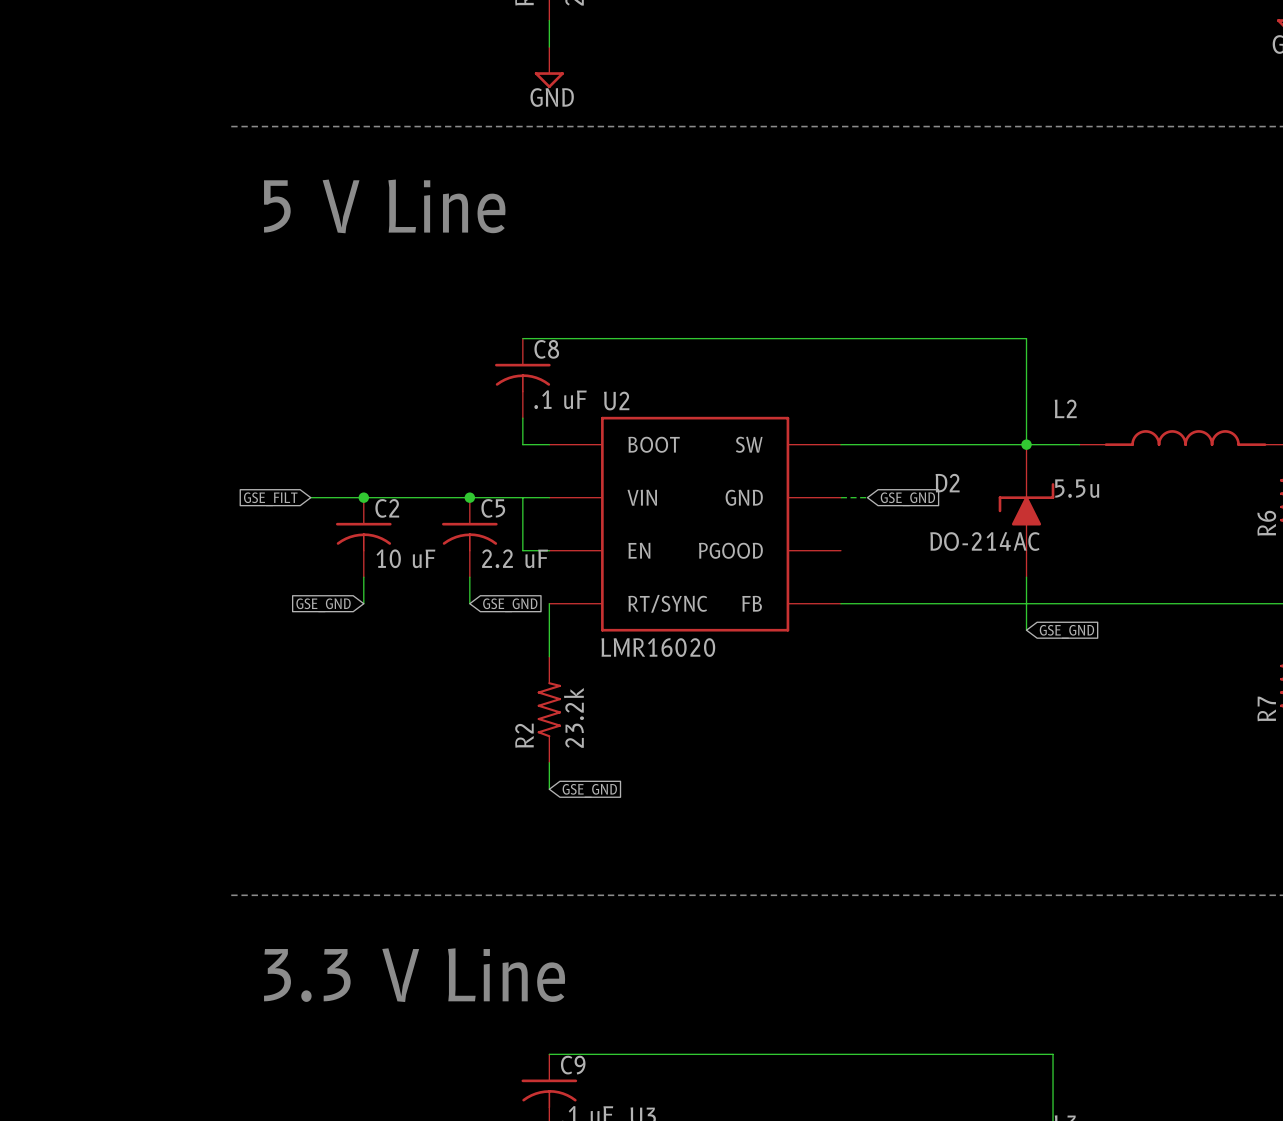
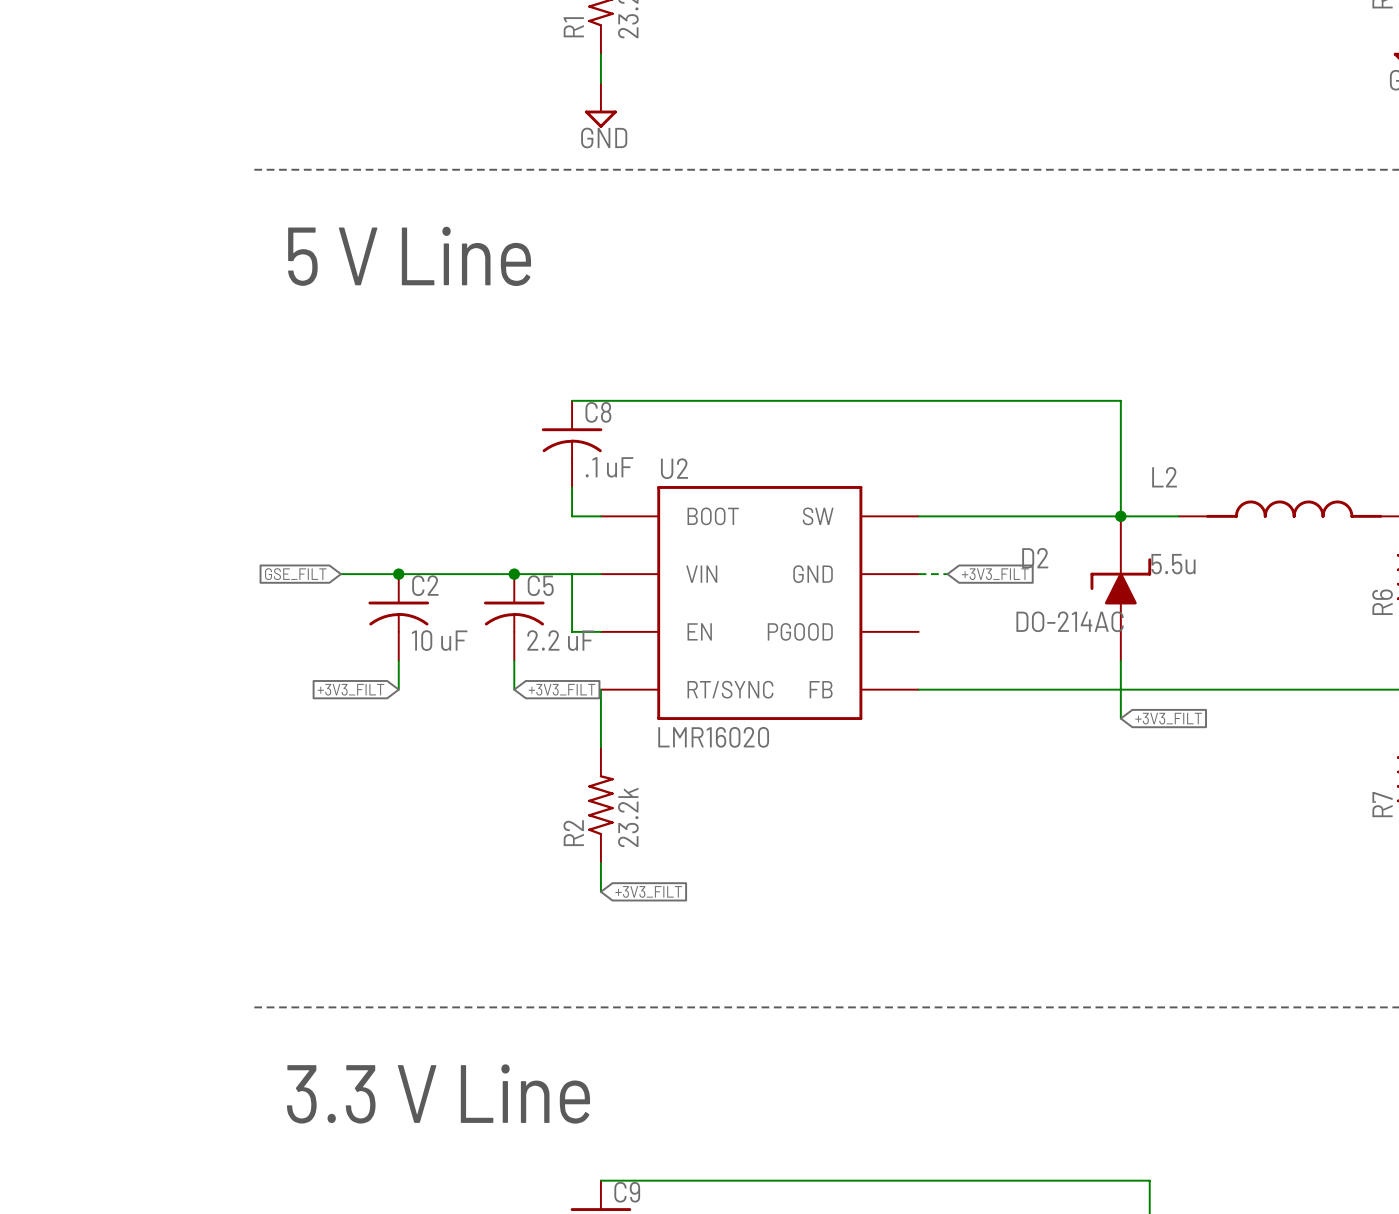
global label: GSE_GND (907, 499) -> +3V3_FILT (995, 574)
global label: GSE_GND (323, 605) -> +3V3_FILT (350, 689)
global label: GSE_GND (510, 605) -> +3V3_FILT (562, 689)
global label: GSE_GND (1066, 631) -> +3V3_FILT (1168, 718)
global label: GSE_GND (589, 790) -> +3V3_FILT (648, 891)

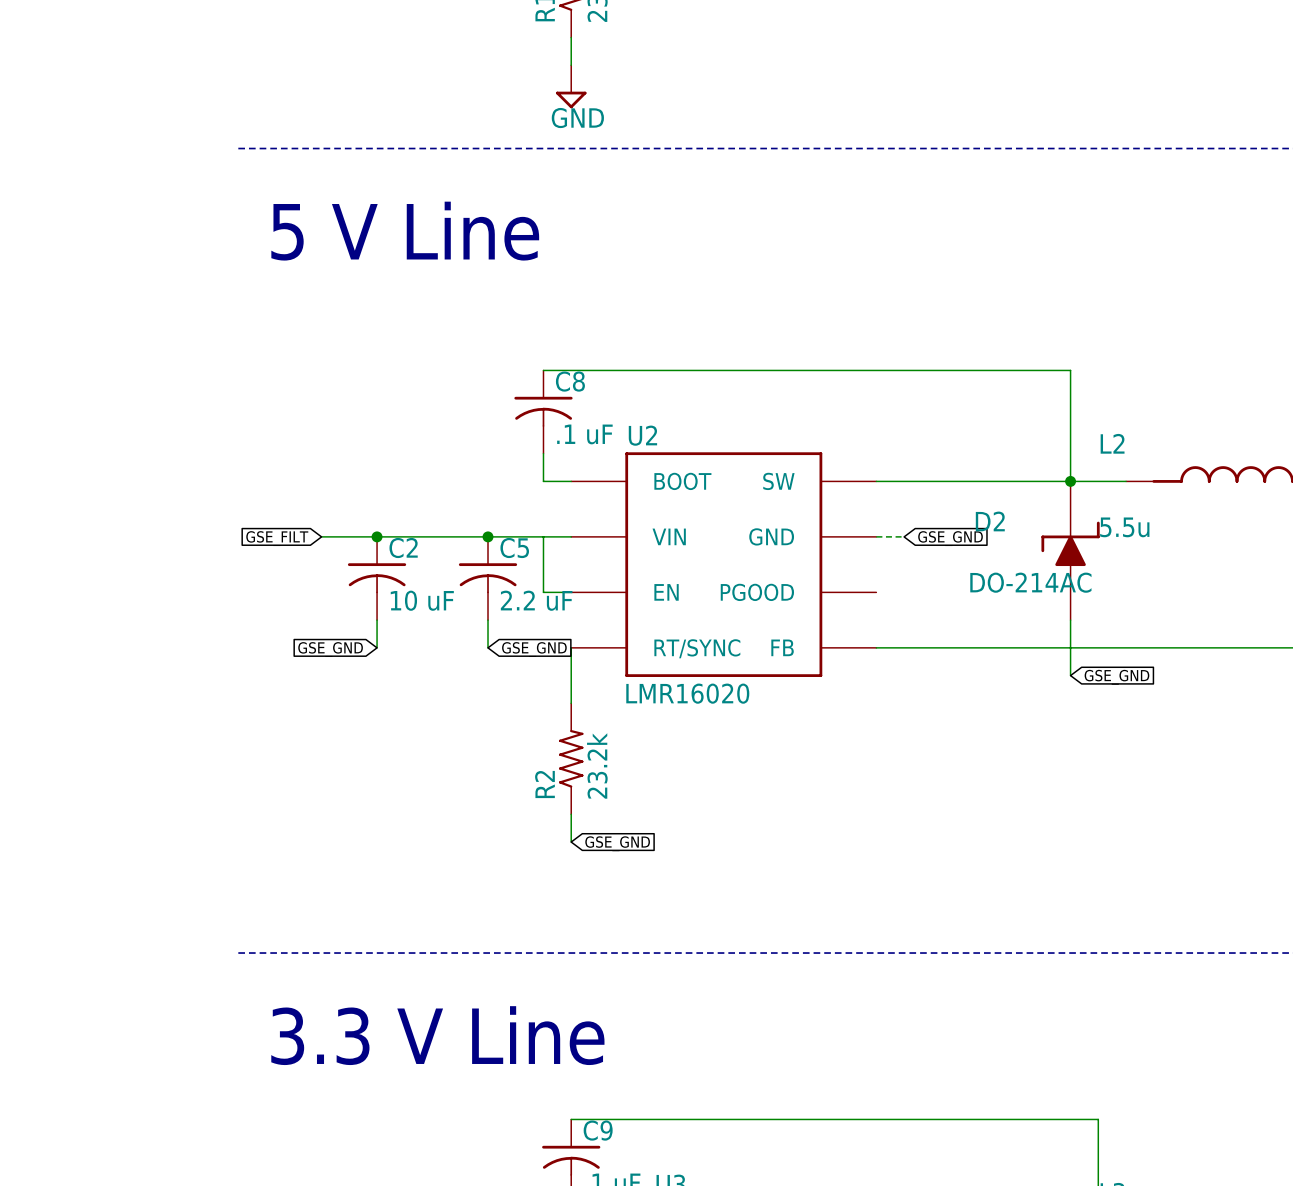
global label: +3V3_FILT (995, 574) -> GSE_GND (950, 538)
global label: +3V3_FILT (350, 689) -> GSE_GND (330, 649)
global label: +3V3_FILT (562, 689) -> GSE_GND (534, 649)
global label: +3V3_FILT (1168, 718) -> GSE_GND (1116, 677)
global label: +3V3_FILT (648, 891) -> GSE_GND (617, 843)

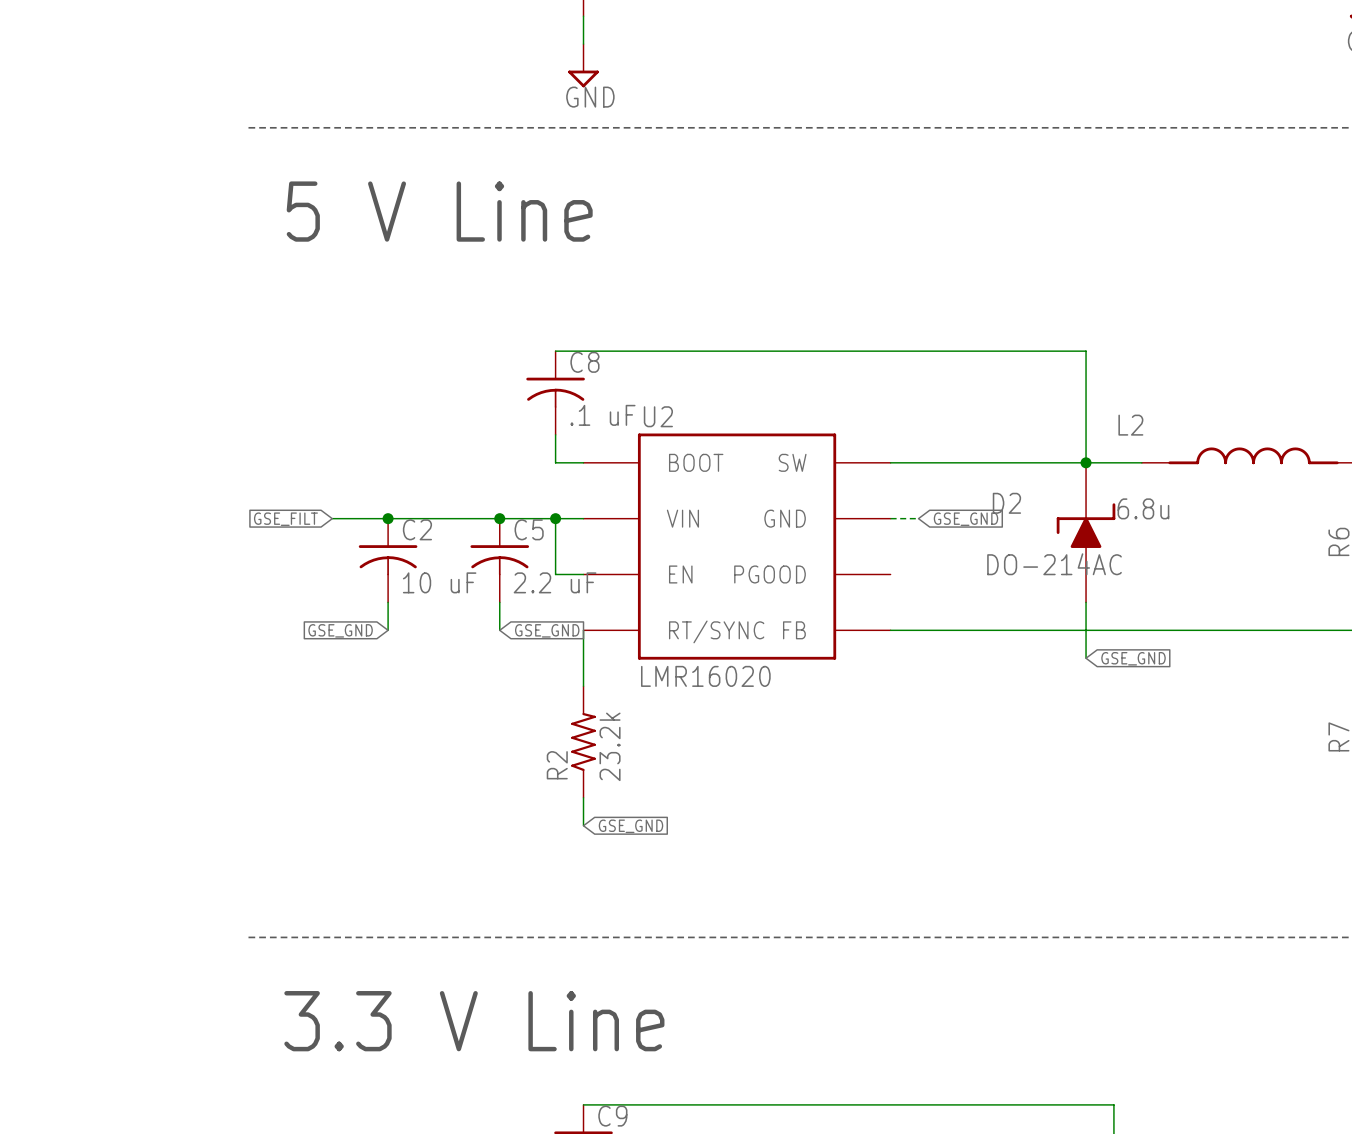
L2 value: 5.5u (1124, 527) -> 6.8u (1143, 508)
junction: none -> (555, 518)

